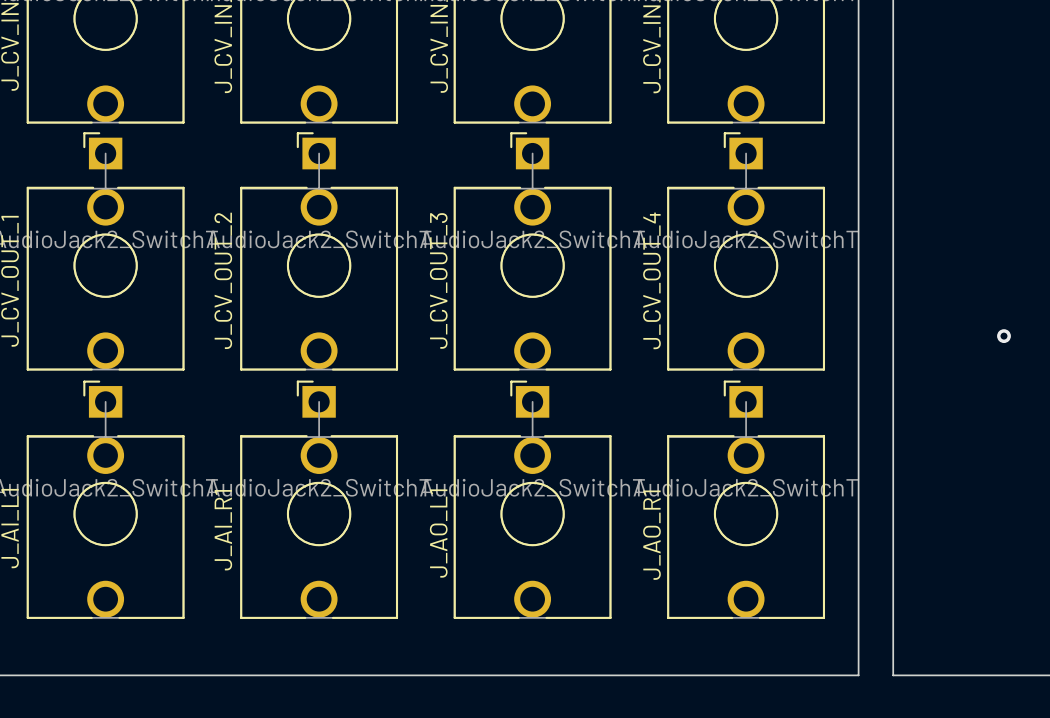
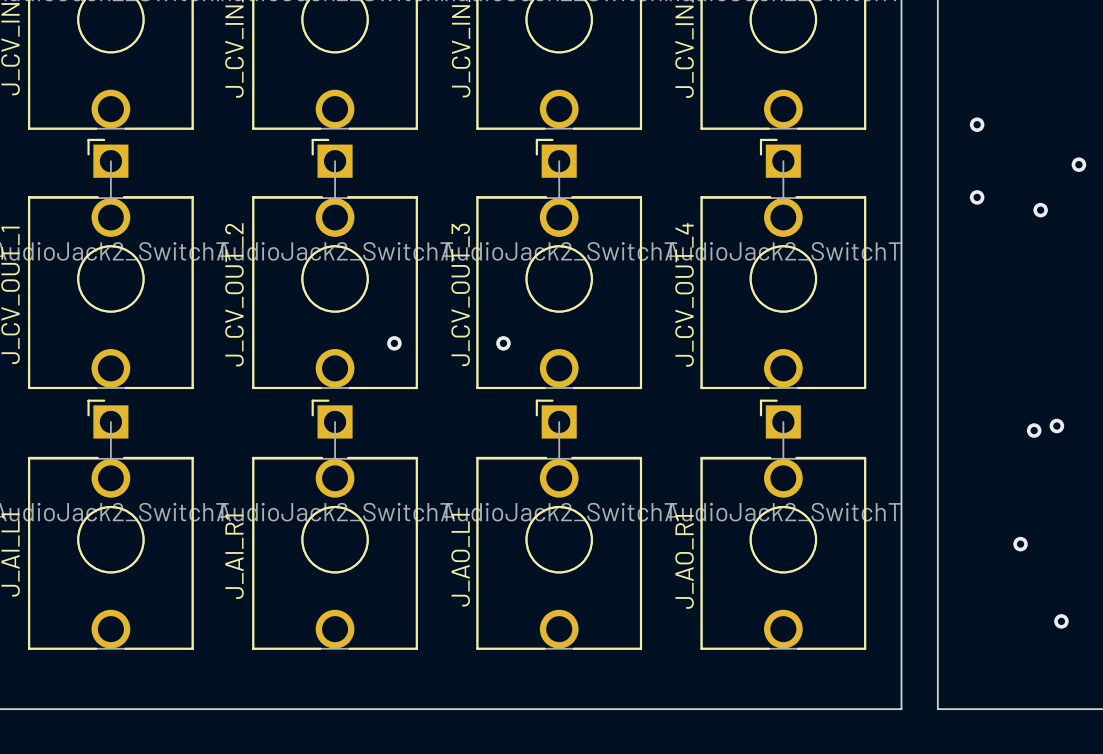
via: none -> (977, 124)
via: none -> (1078, 164)
via: none -> (977, 197)
via: none -> (1040, 210)
via: none -> (394, 343)
via: none -> (503, 343)
via: (1003, 336) -> none
via: none -> (1056, 426)
via: none -> (1034, 430)
via: none -> (1020, 544)
via: none -> (1061, 621)

